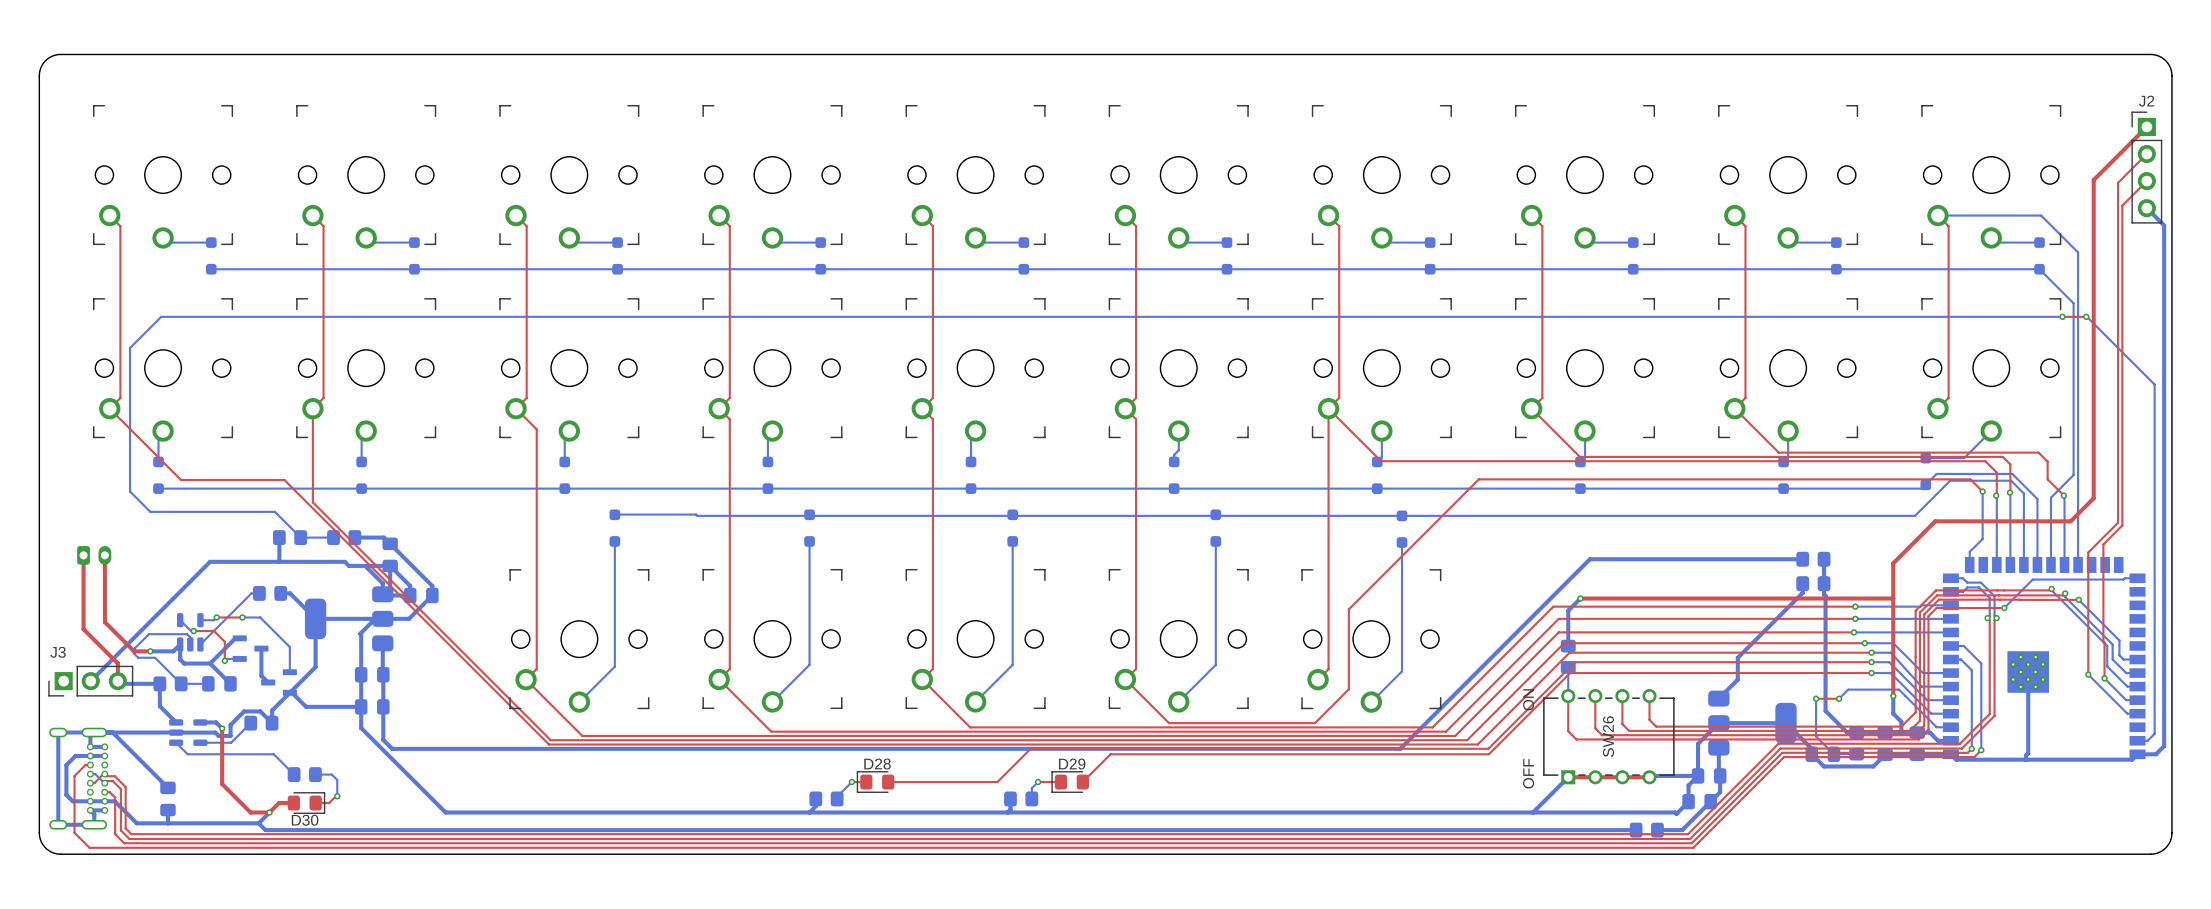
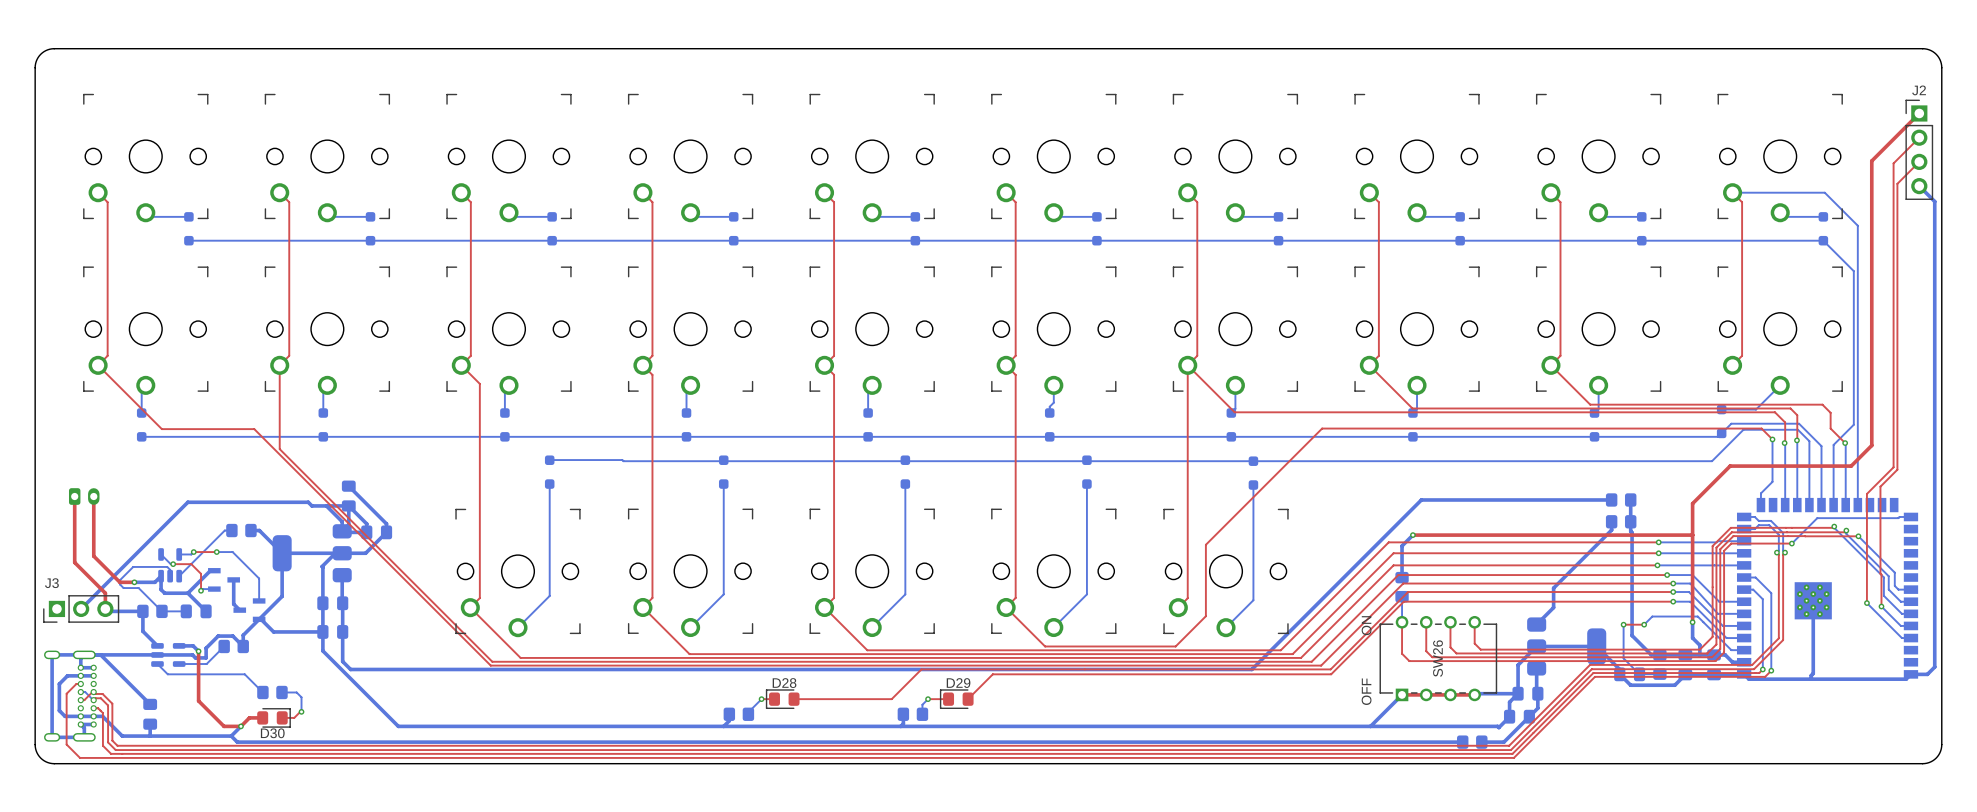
top track: (2062, 316) (2086, 316) -> none
bottom track: (2062, 316) (161, 316) (130, 348) (130, 491) (150, 511) (274, 511) (300, 537) (333, 537) -> none
via: (2062, 316) -> none
bottom track: (2086, 316) (2154, 384) (2154, 733) (2147, 740) (2137, 740) -> none
via: (2086, 316) -> none
bottom track: (279, 537) (279, 561) -> none
part: (290, 537) -> none
part: (344, 537) -> none
bottom track: (354, 537) (383, 537) (390, 543) -> none

